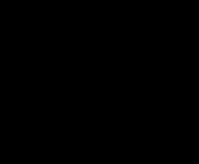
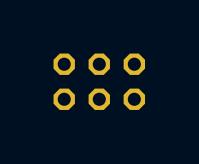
part: none -> (99, 81)

